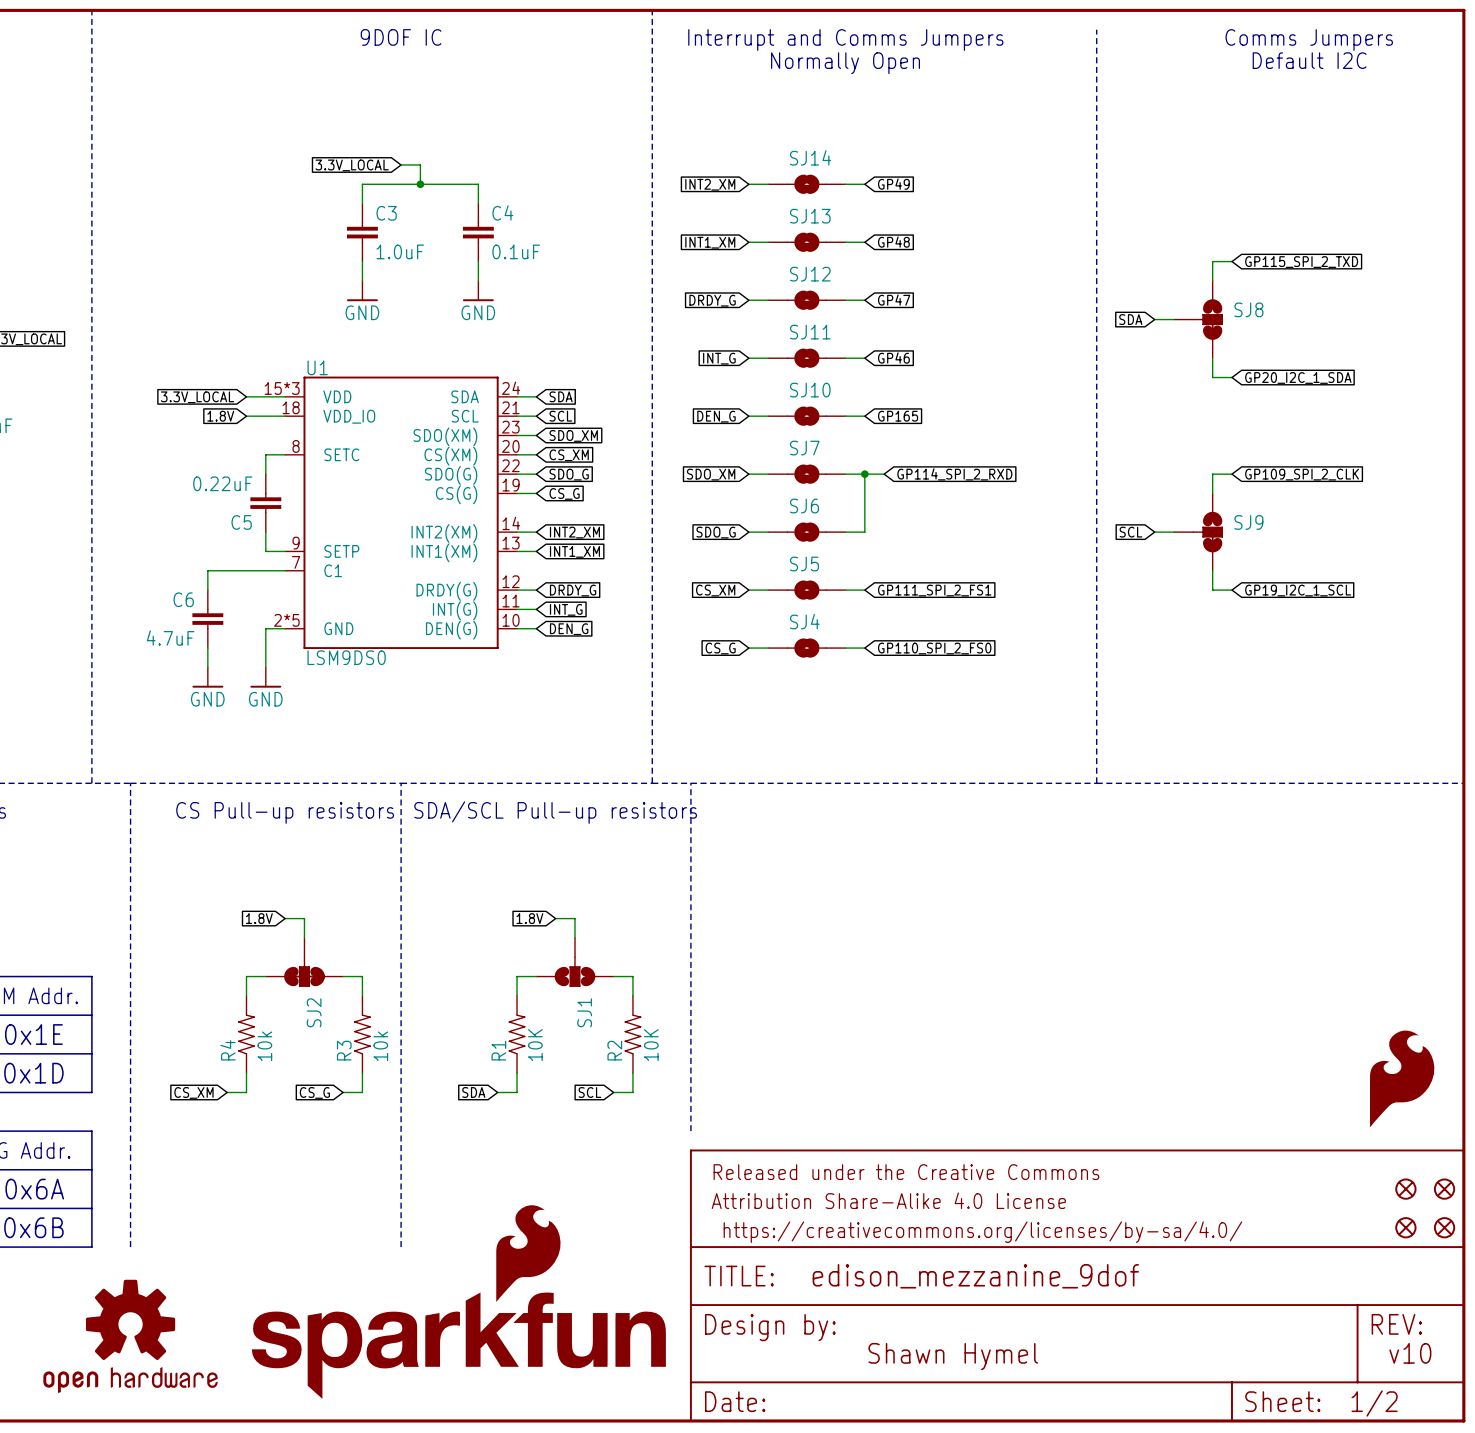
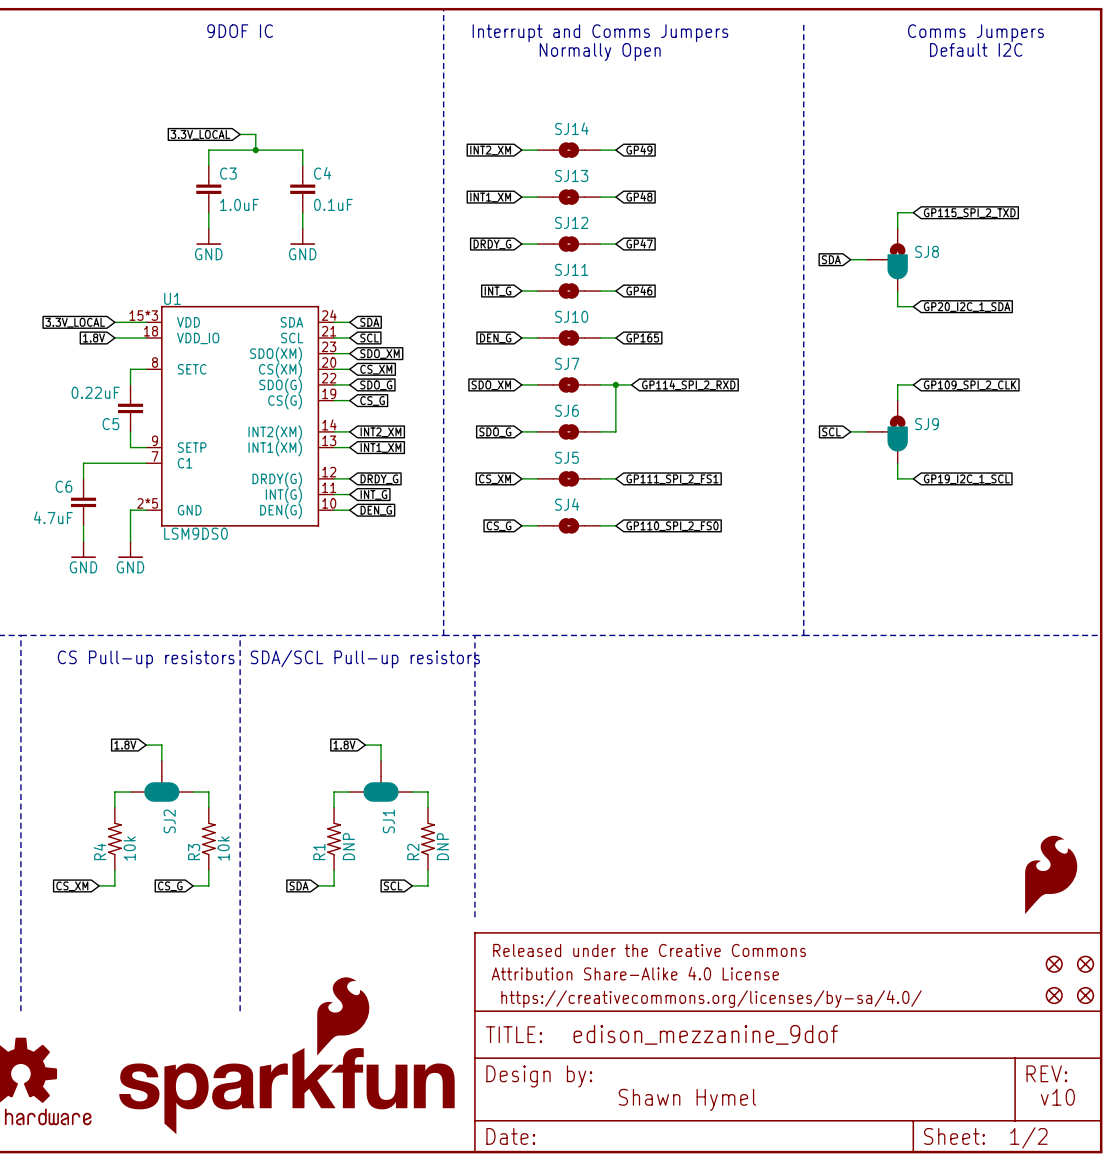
SJ8 symbol: [1174, 280, 1223, 359] -> [866, 228, 908, 292]
SJ9 symbol: [1174, 493, 1223, 571] -> [866, 400, 908, 464]
SJ2 symbol: [265, 937, 344, 987] -> [130, 760, 194, 802]
SJ1 symbol: [536, 937, 614, 987] -> [349, 760, 413, 802]
R1 value: 10K (535, 1045) -> DNP (348, 846)
R2 value: 10K (651, 1045) -> DNP (442, 846)

